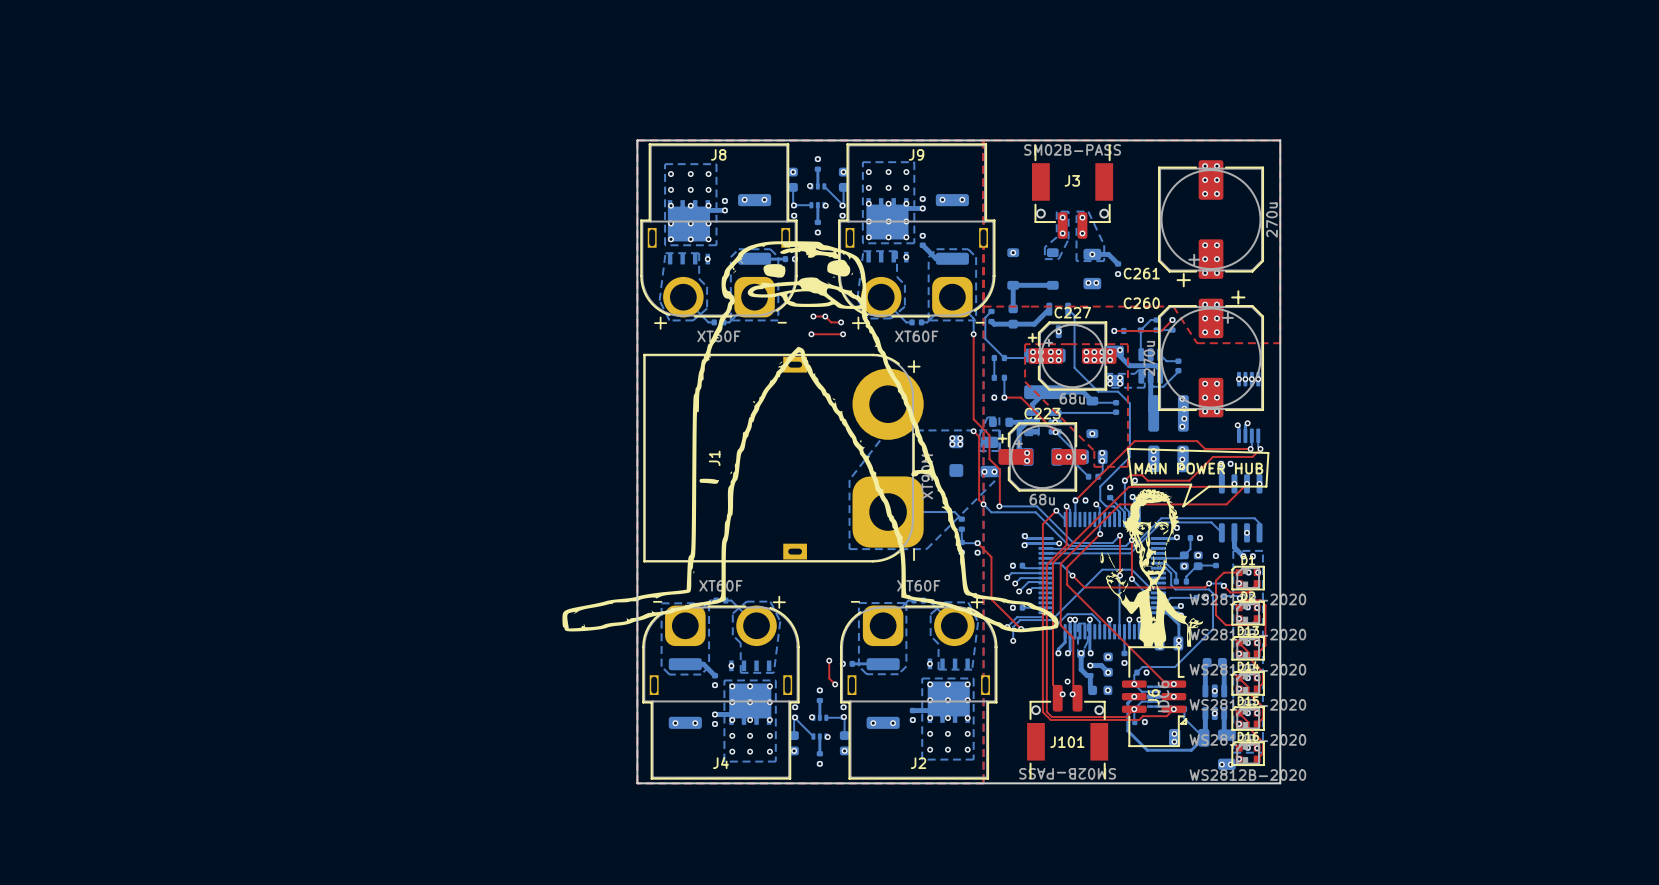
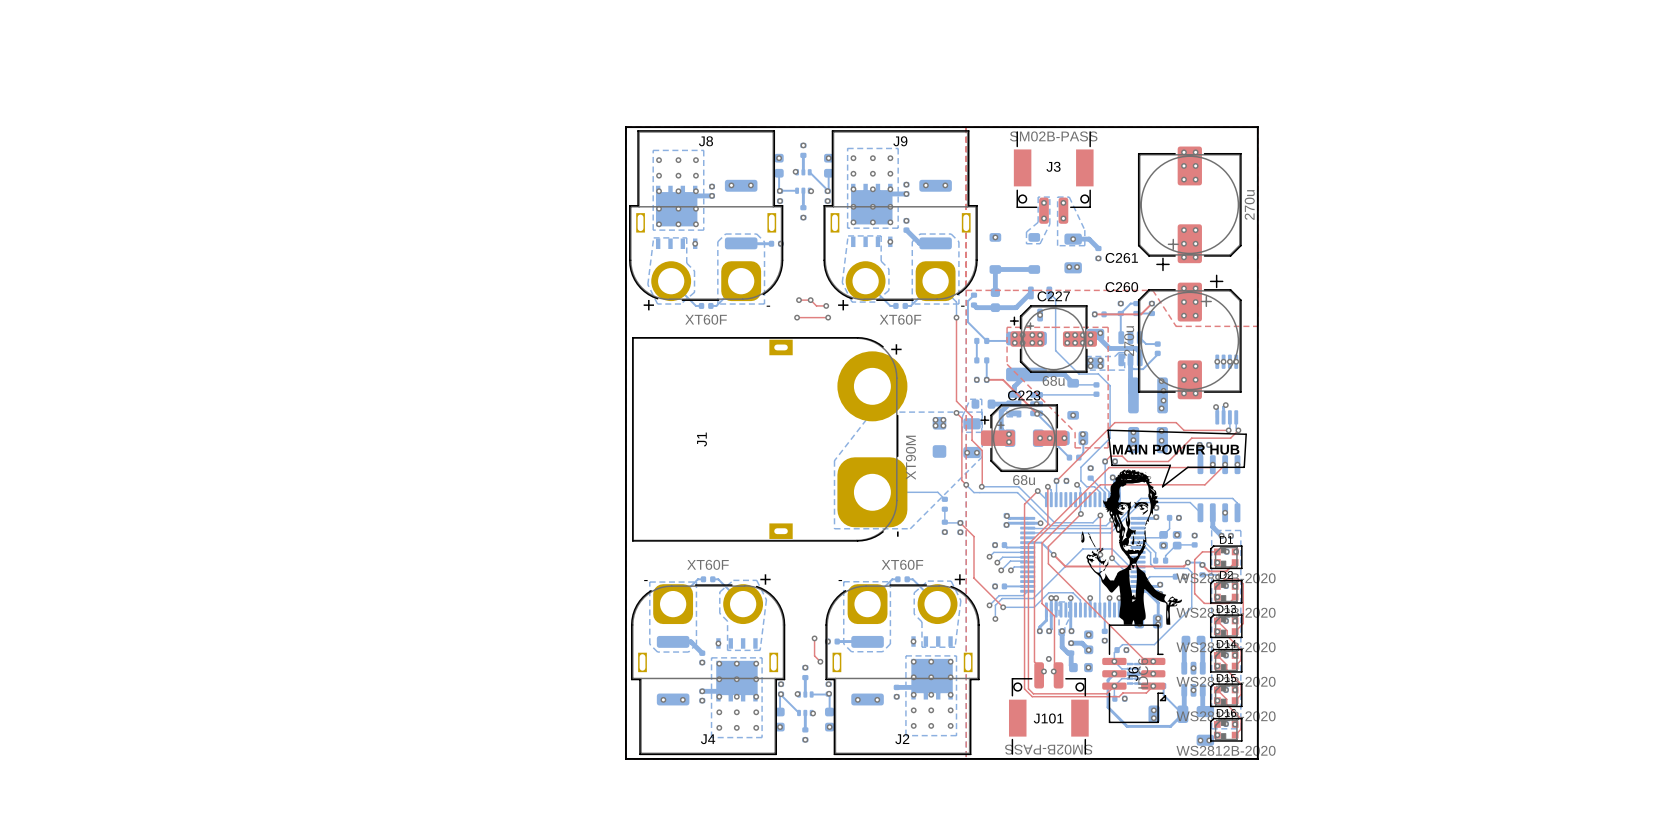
drawing: [562, 241, 1059, 633] -> none

